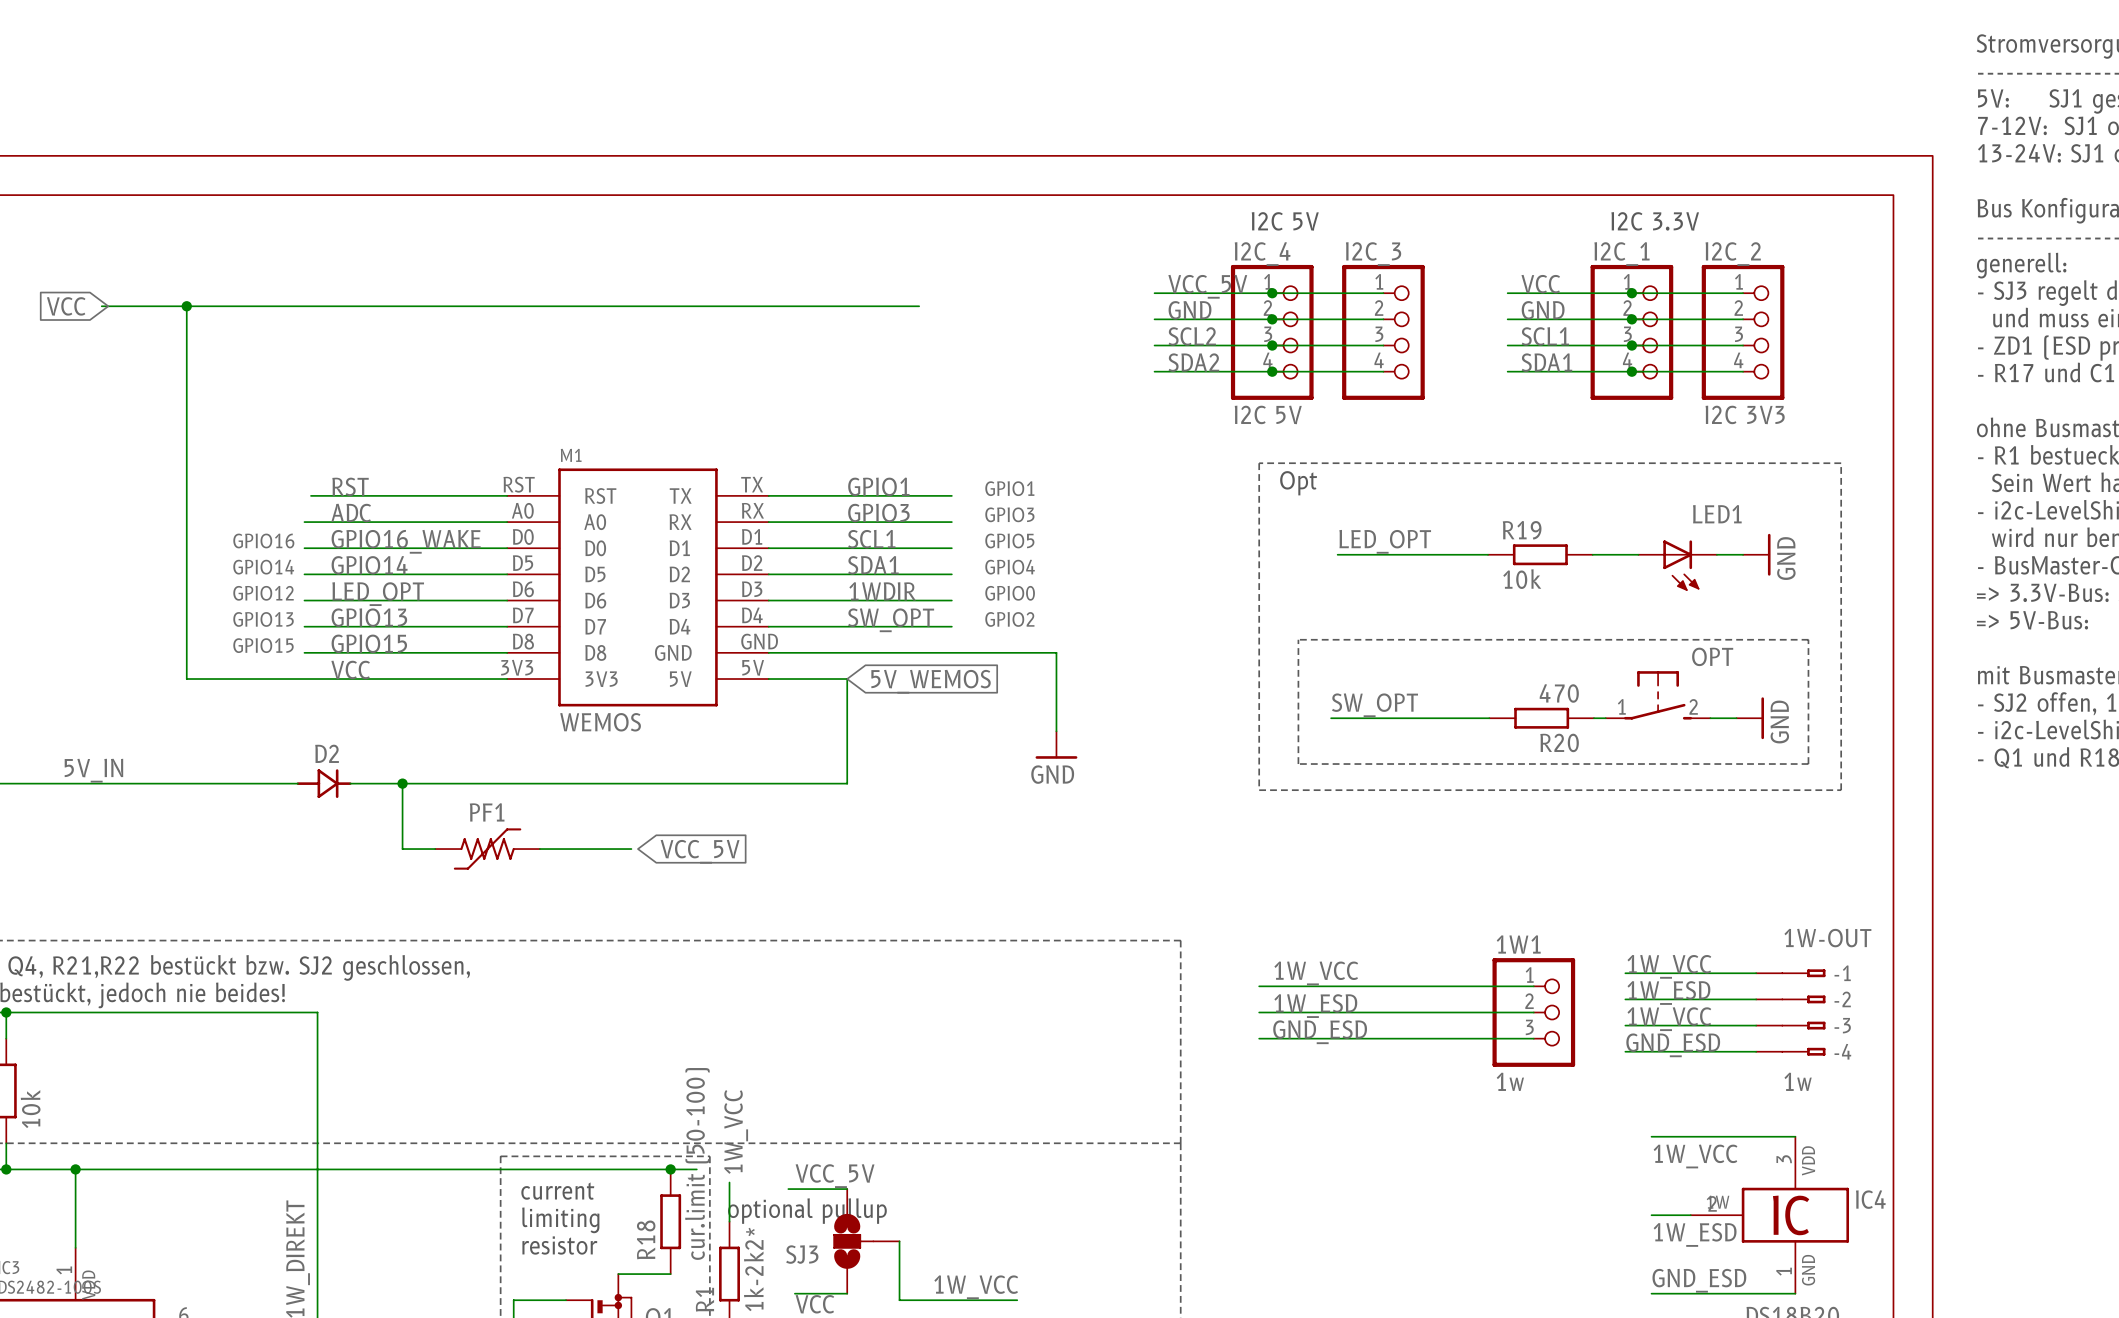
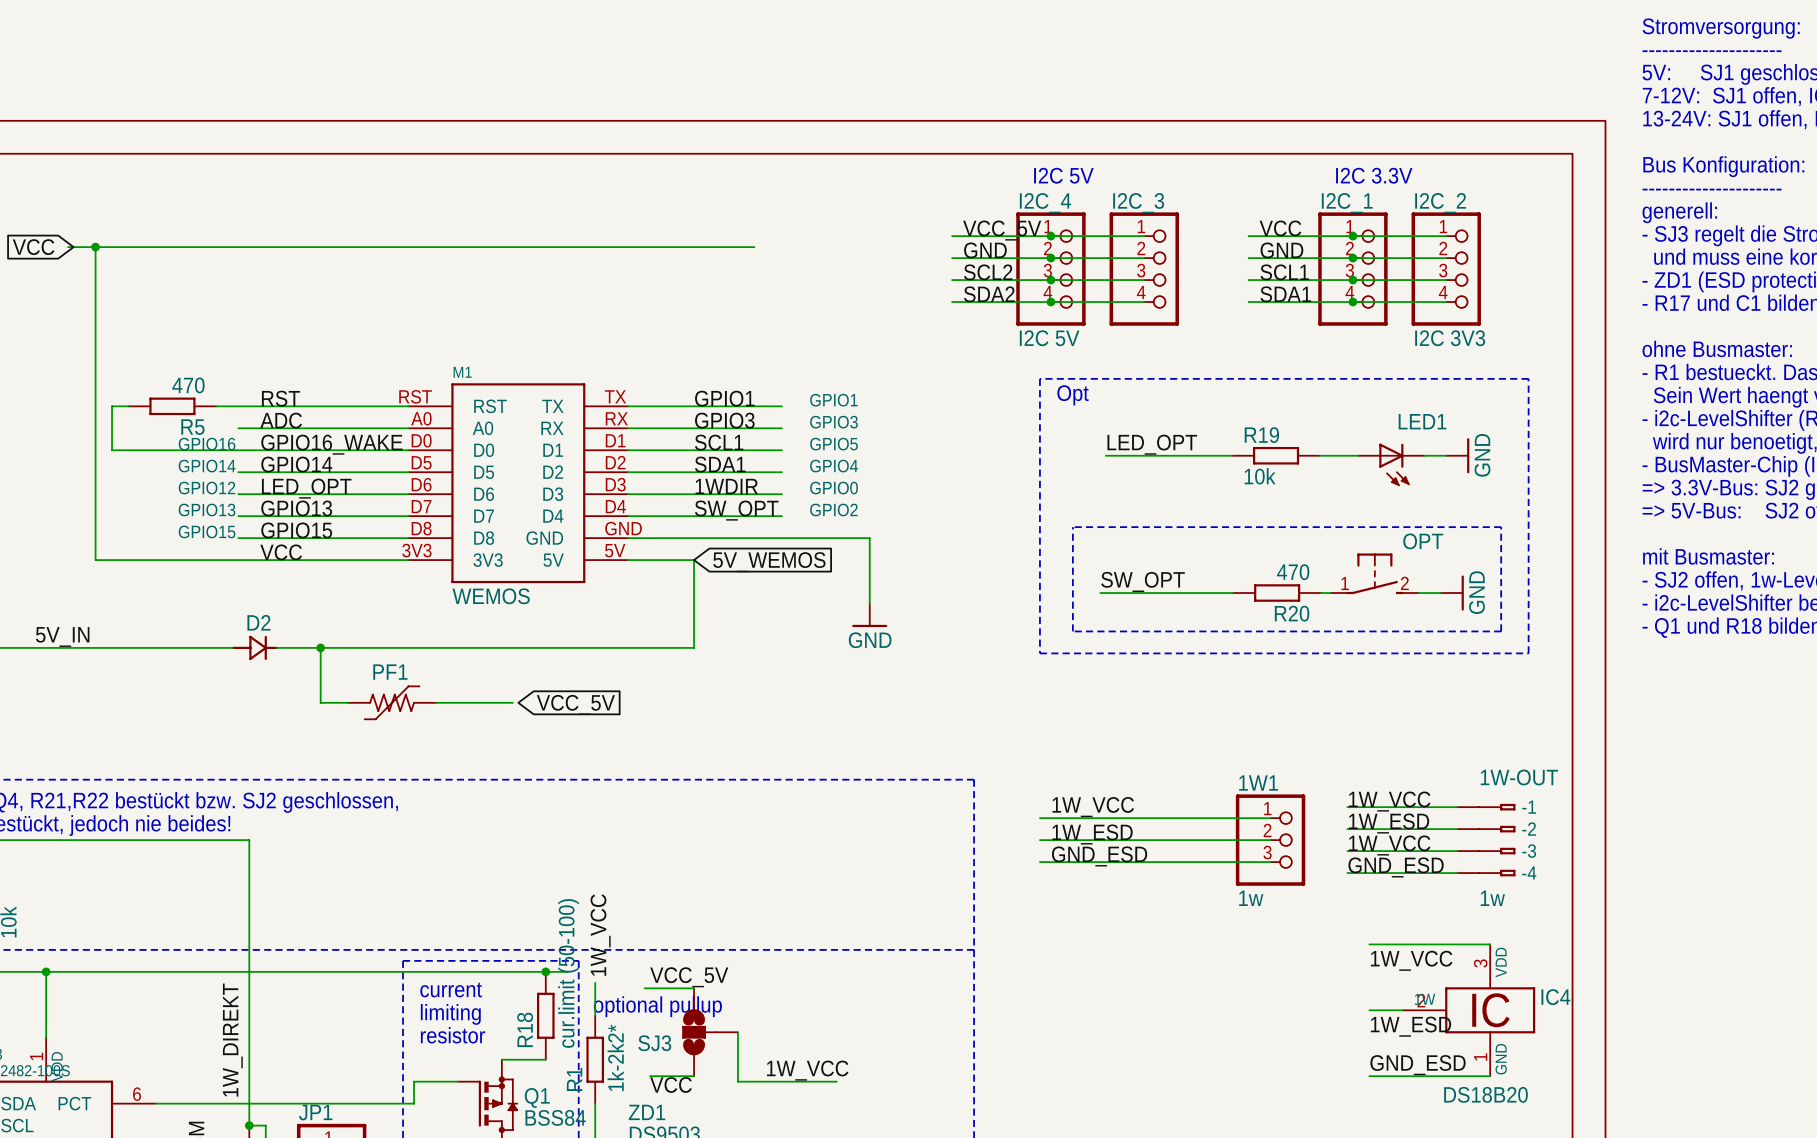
wire: (186, 306) (186, 679) -> (95, 247) (95, 560) (139, 560)
junction position: (186, 306) -> (95, 247)
wire: none -> (128, 406) (112, 406) (112, 450) (238, 450)
R5: none -> 470 (172, 406)
wire: none -> (216, 406) (243, 406)

